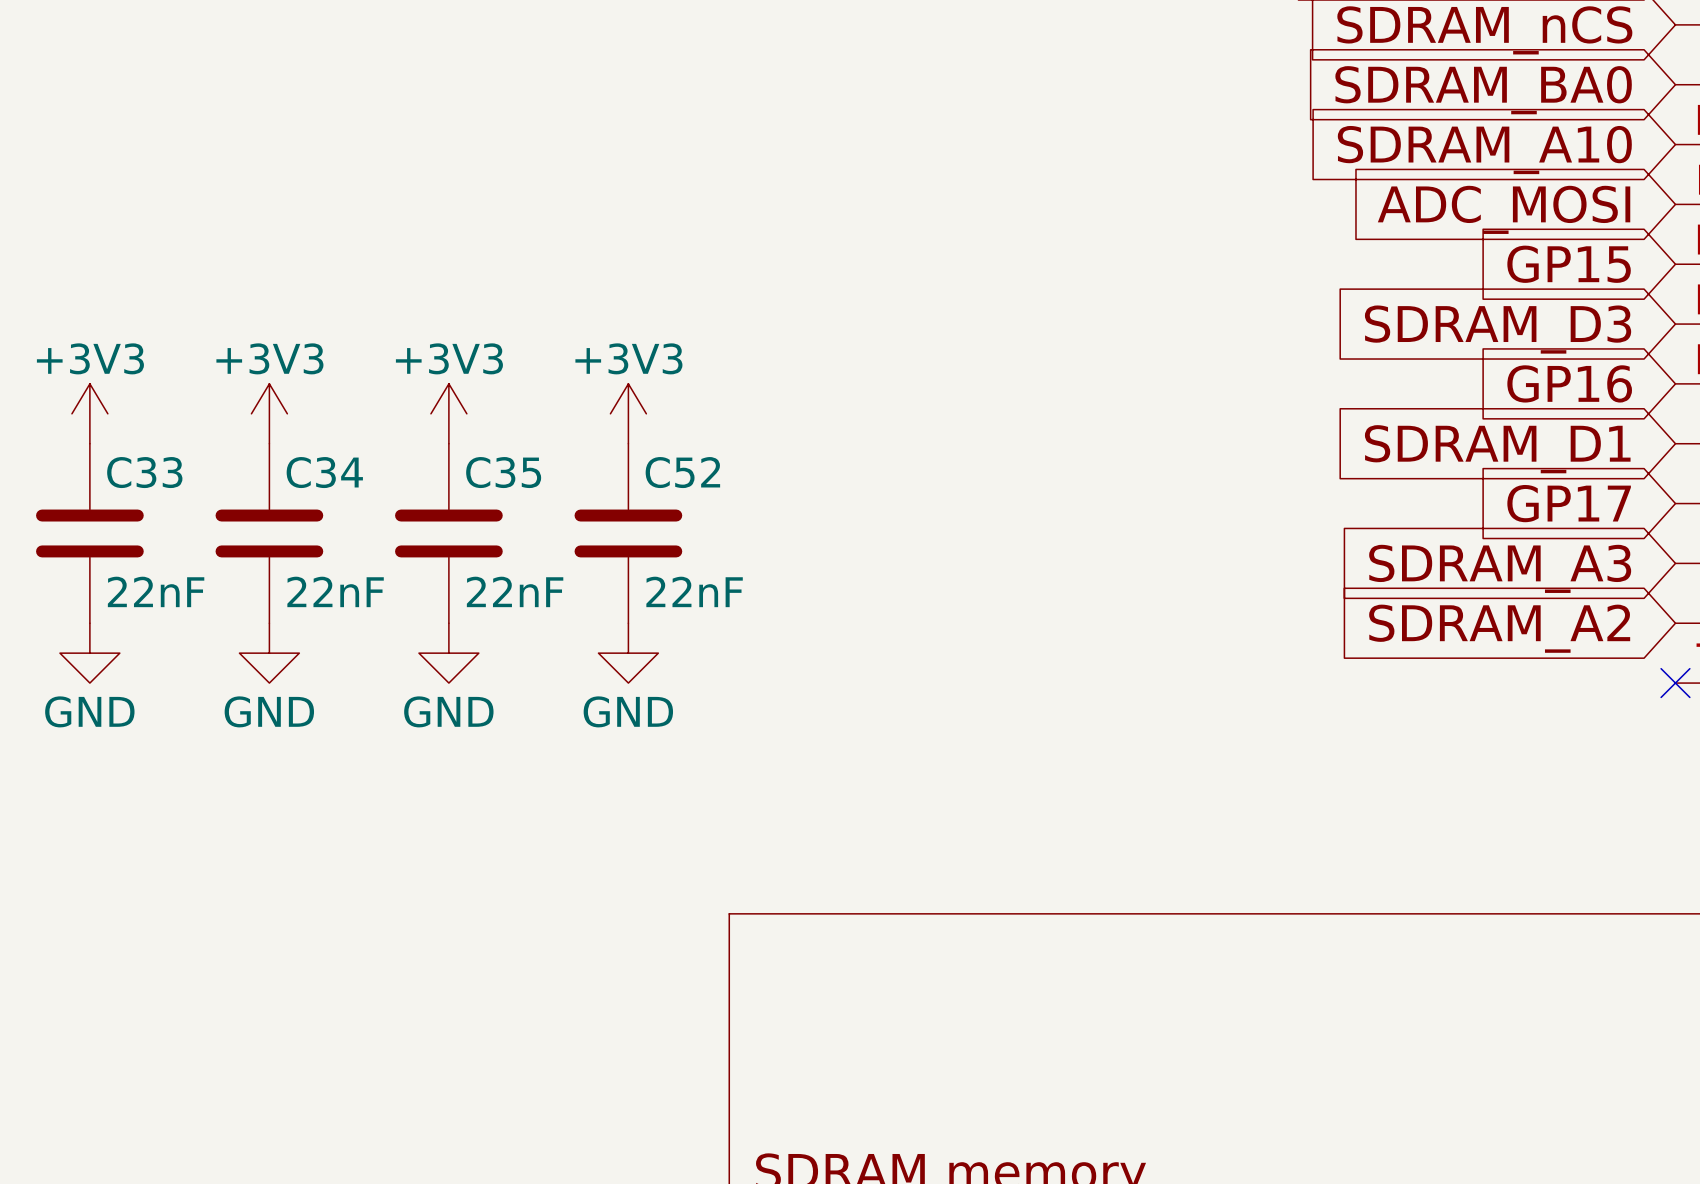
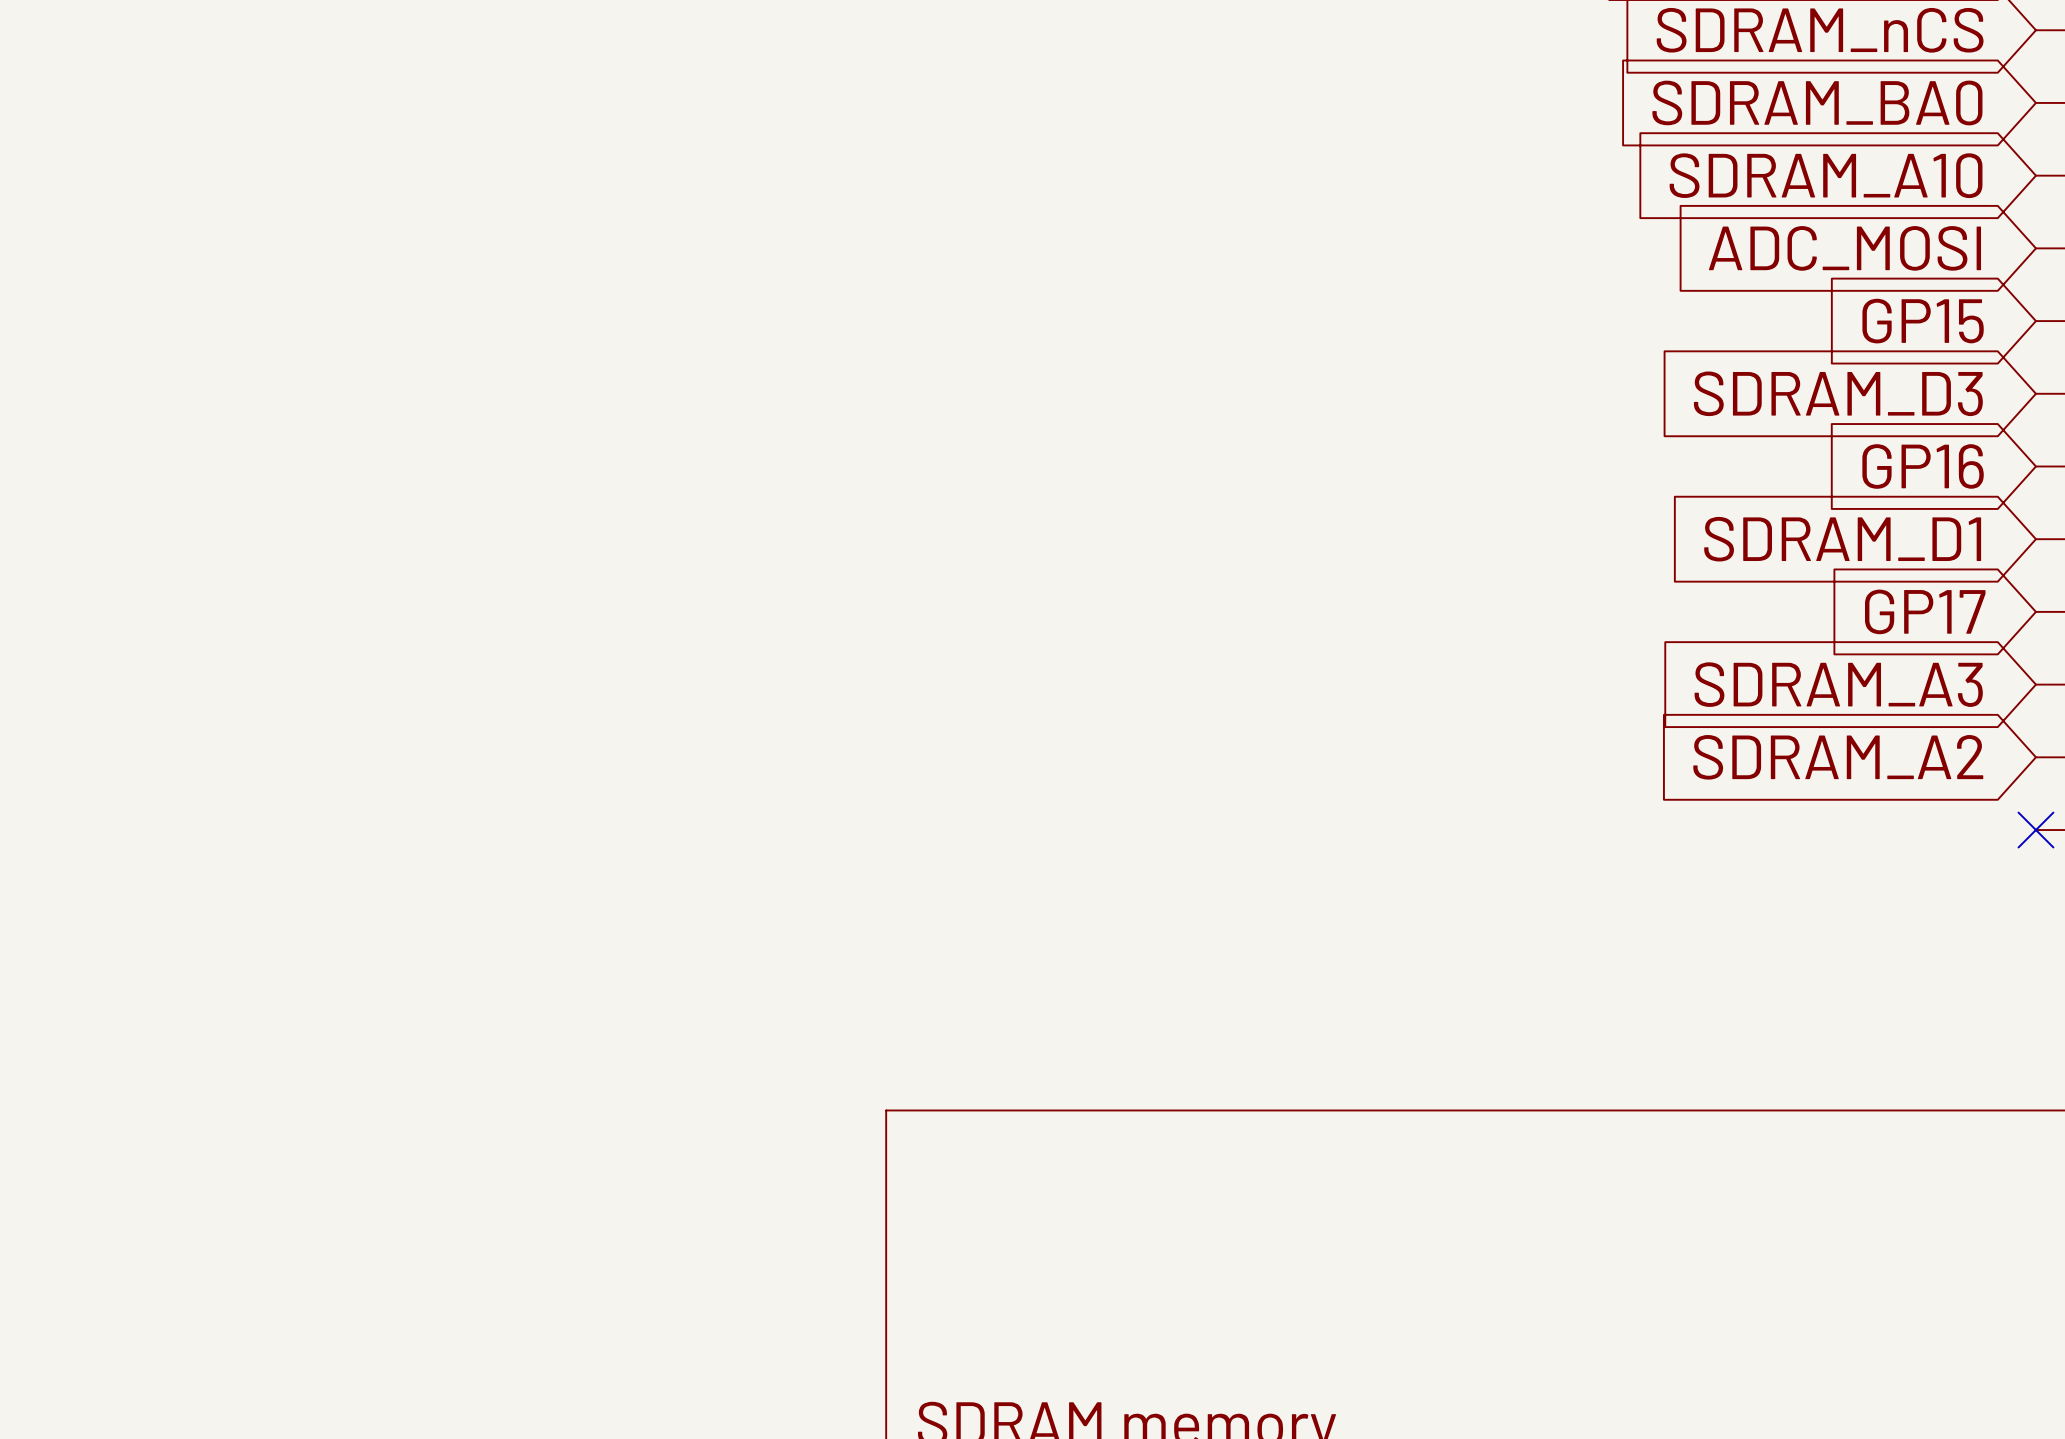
power symbol: +3V3 (89, 413) -> none
power symbol: +3V3 (269, 413) -> none
power symbol: +3V3 (448, 413) -> none
power symbol: +3V3 (628, 413) -> none
C33: 22nF (89, 533) -> none
C34: 22nF (269, 533) -> none
C35: 22nF (448, 533) -> none
C52: 22nF (628, 533) -> none
power symbol: GND (89, 653) -> none
power symbol: GND (269, 653) -> none
power symbol: GND (448, 653) -> none
power symbol: GND (628, 653) -> none

